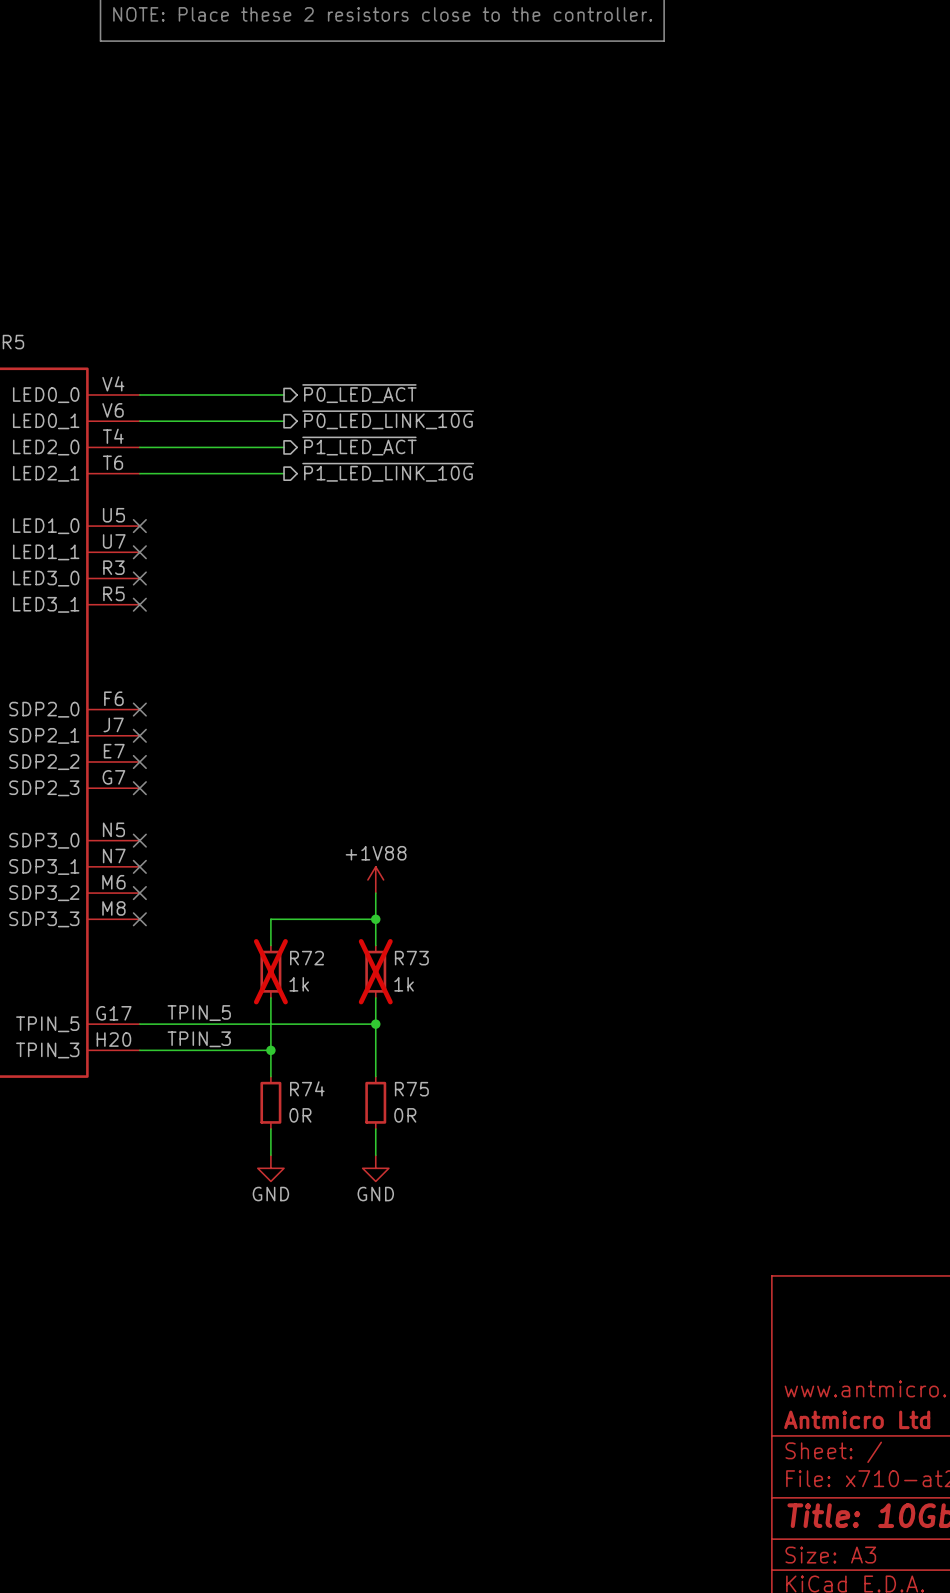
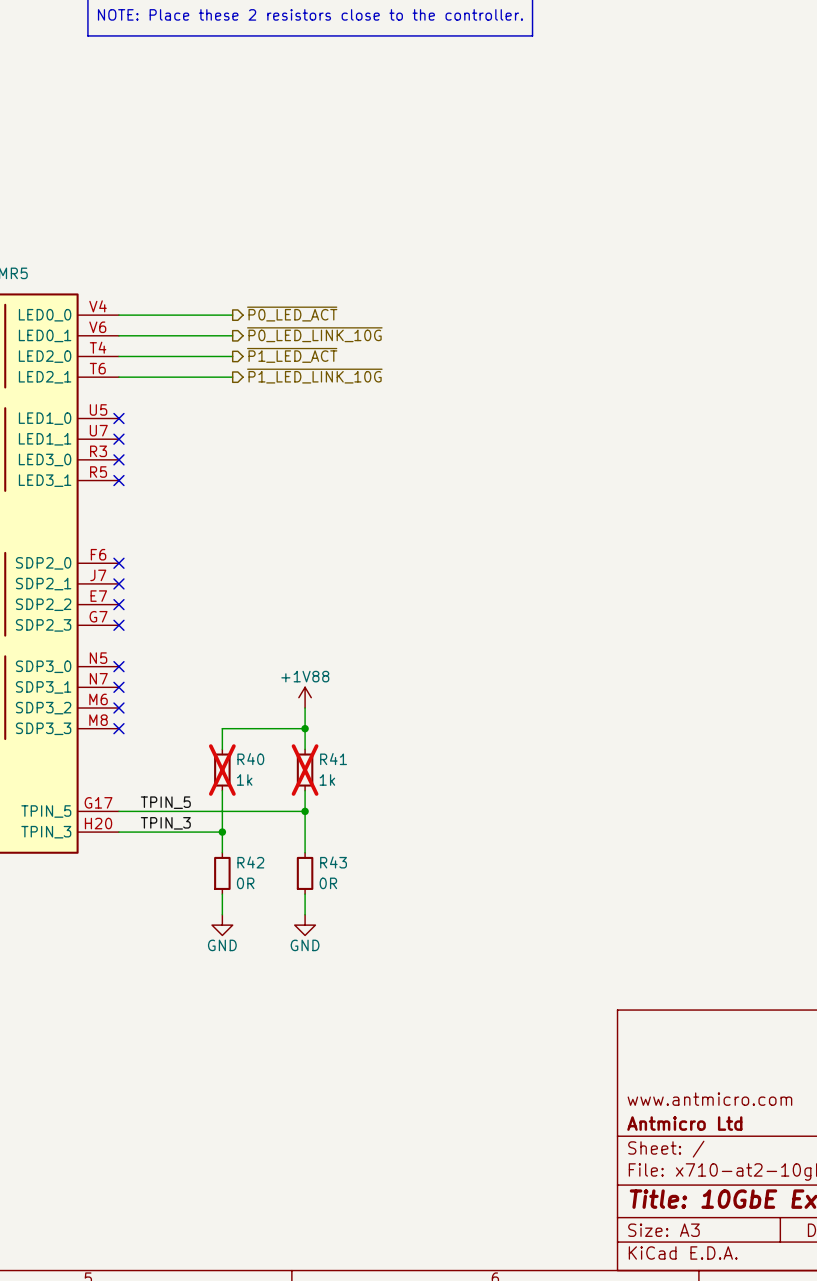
R72 name: R72 (307, 958) -> R40 (250, 759)
R73 name: R73 (411, 958) -> R41 (333, 759)
R74 name: R74 (307, 1088) -> R42 (250, 862)
R75 name: R75 (411, 1089) -> R43 (333, 862)

